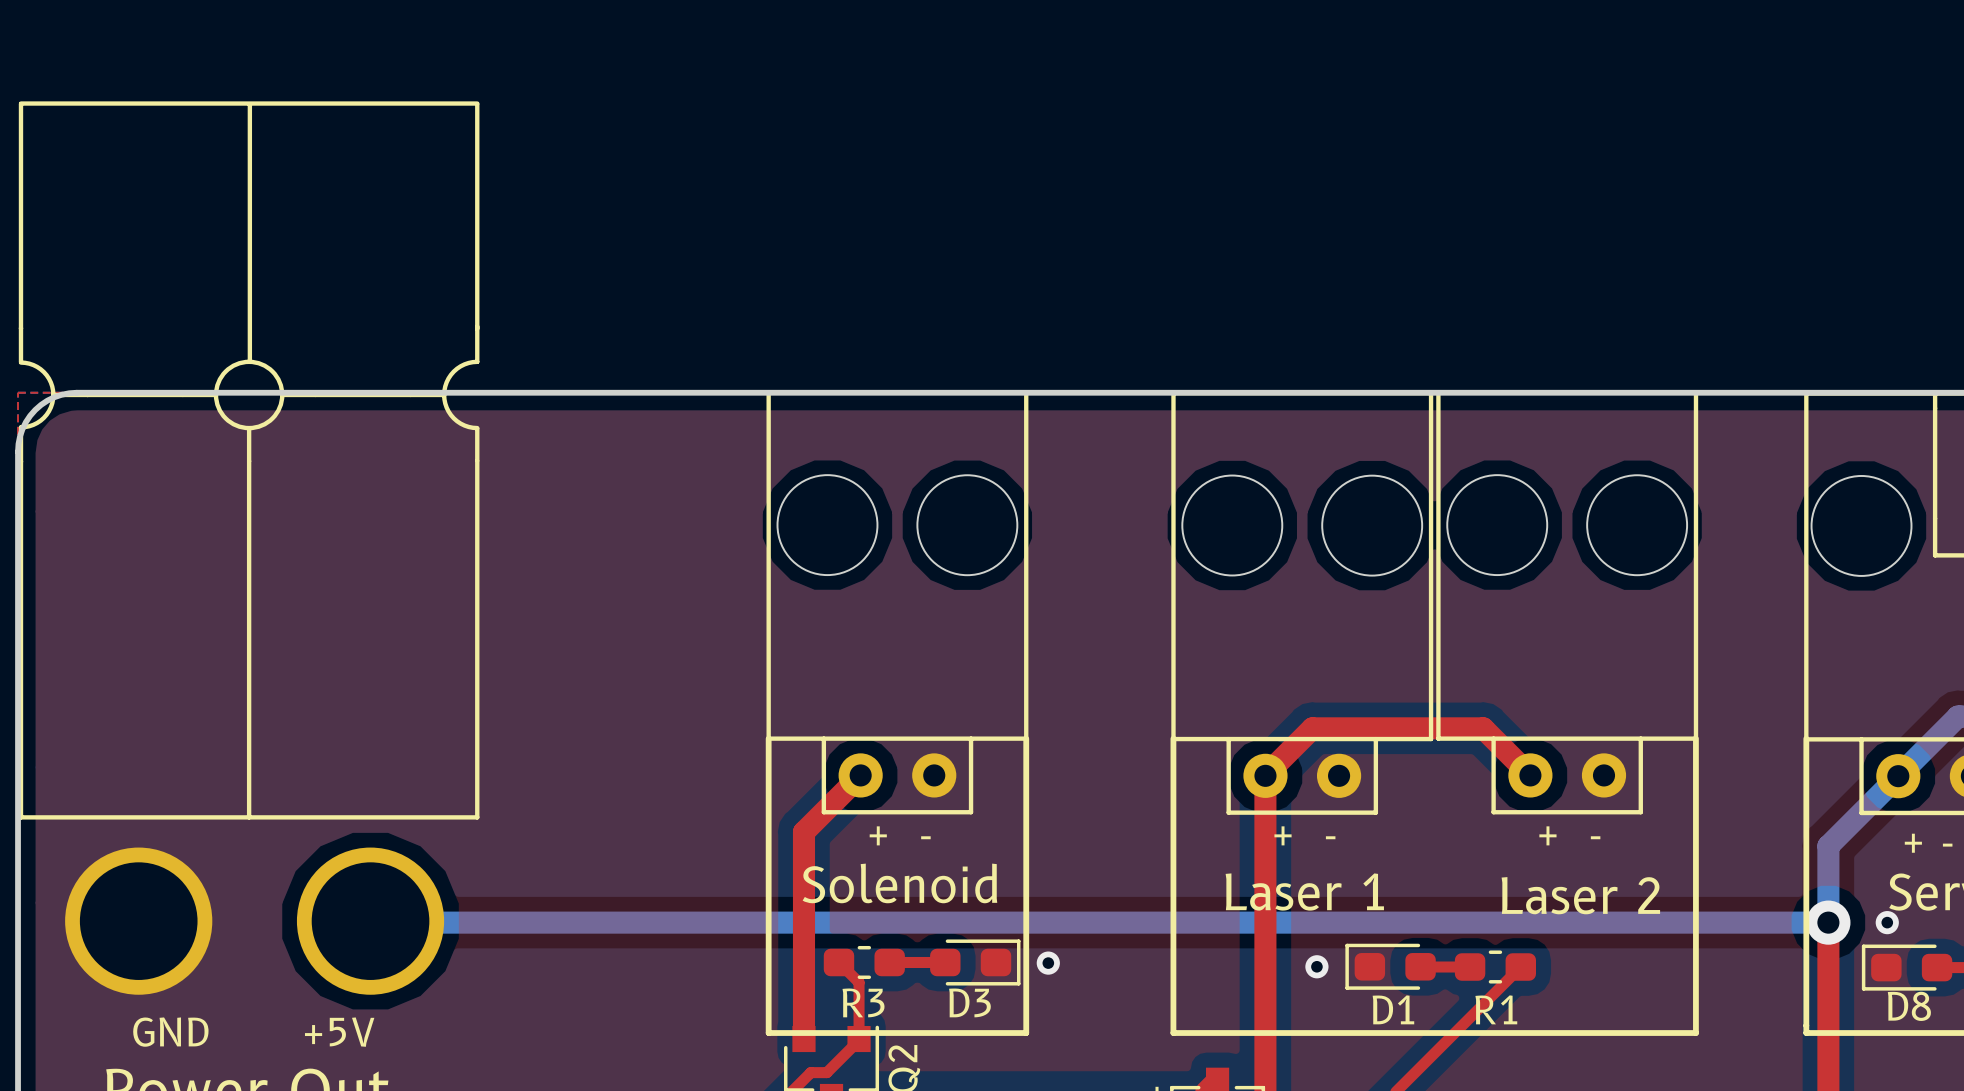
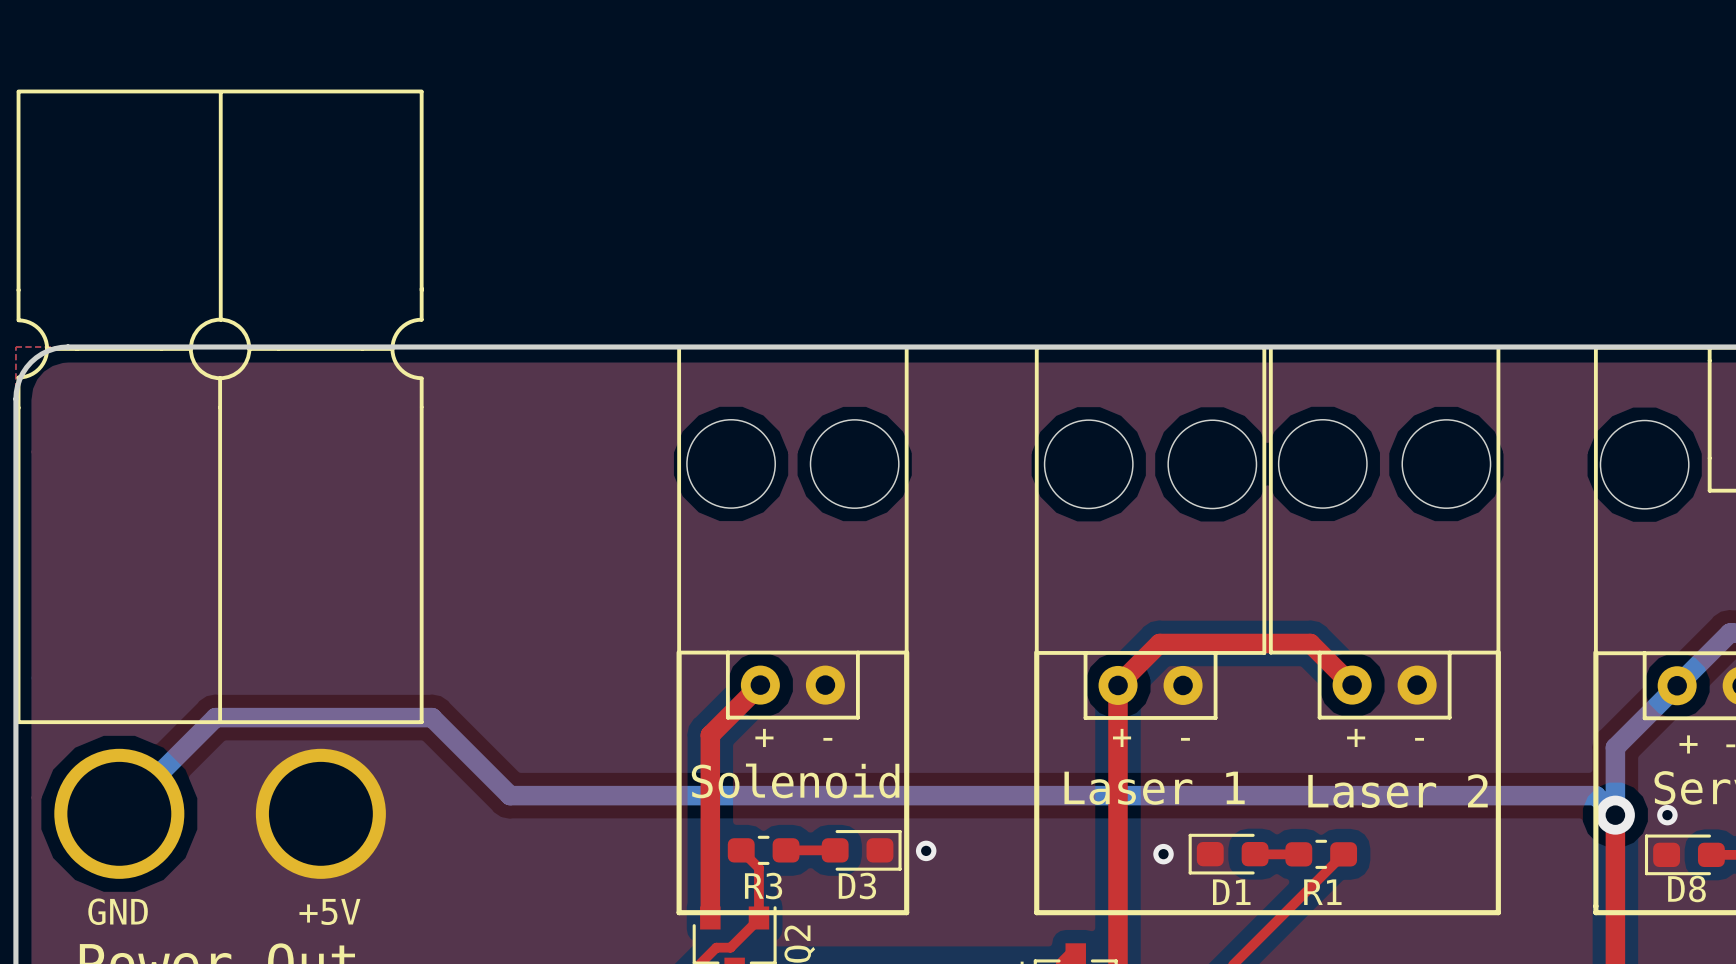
part footprint: [18, 101, 480, 995] -> [16, 89, 424, 879]
bottom track: (370, 921) (1828, 922) -> (119, 813) (215, 717) (432, 717) (510, 795) (1595, 795) (1615, 815)

